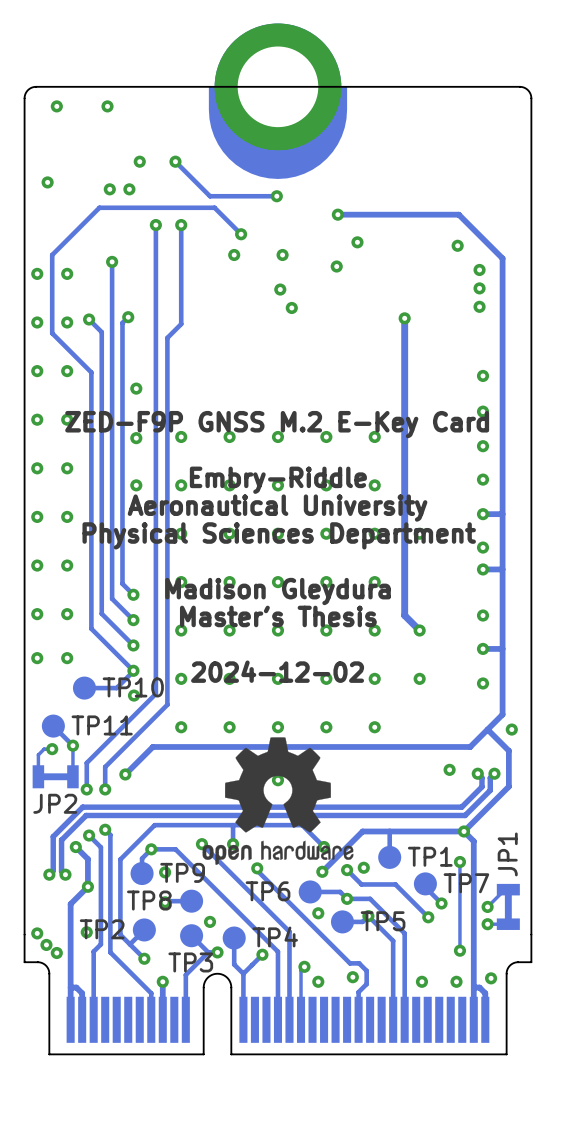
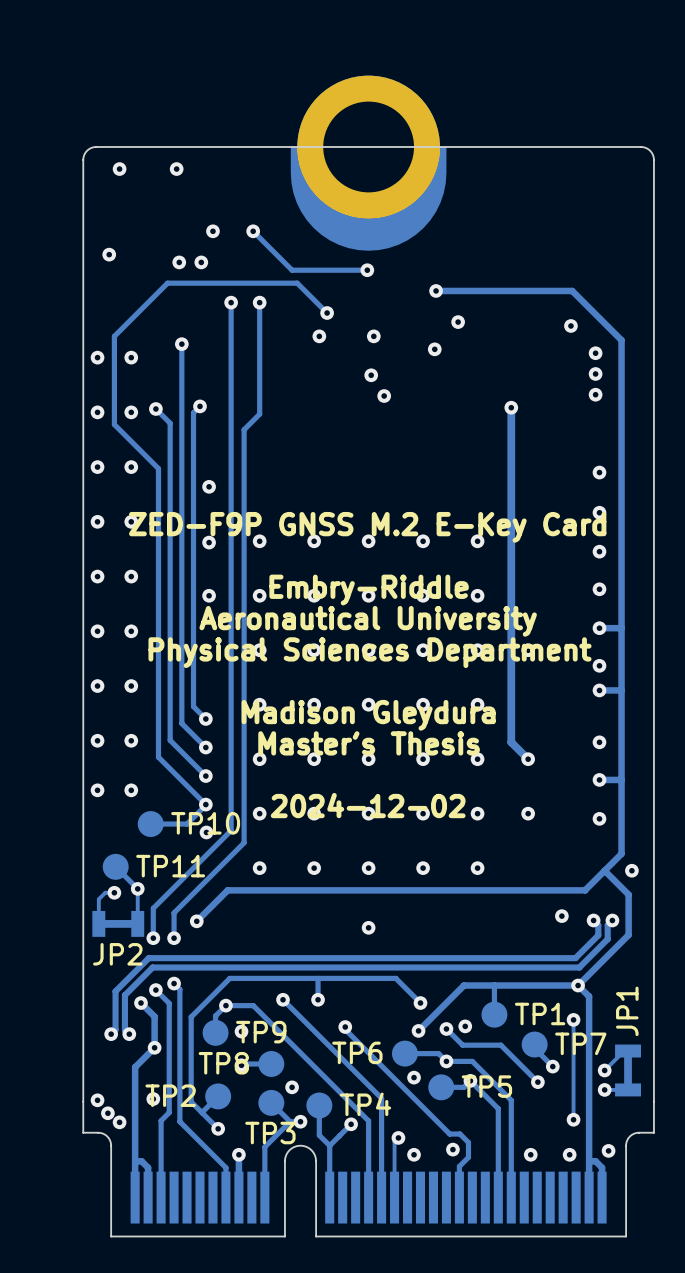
drawing: [202, 737, 354, 865] -> none

